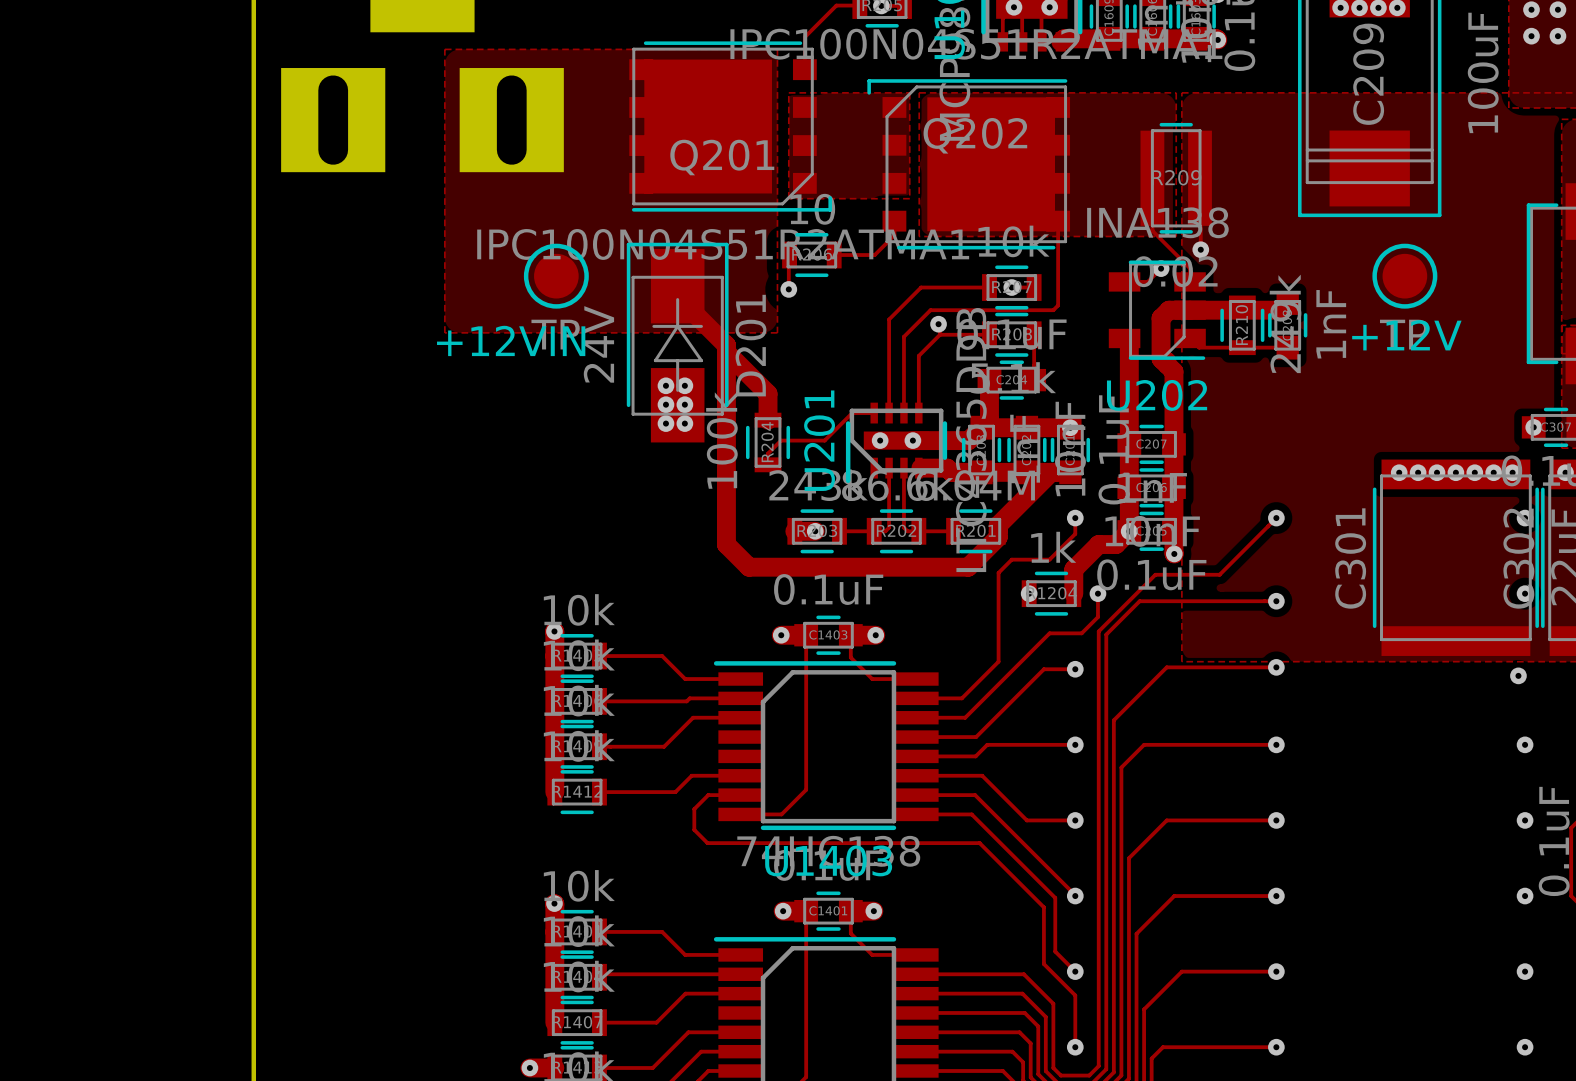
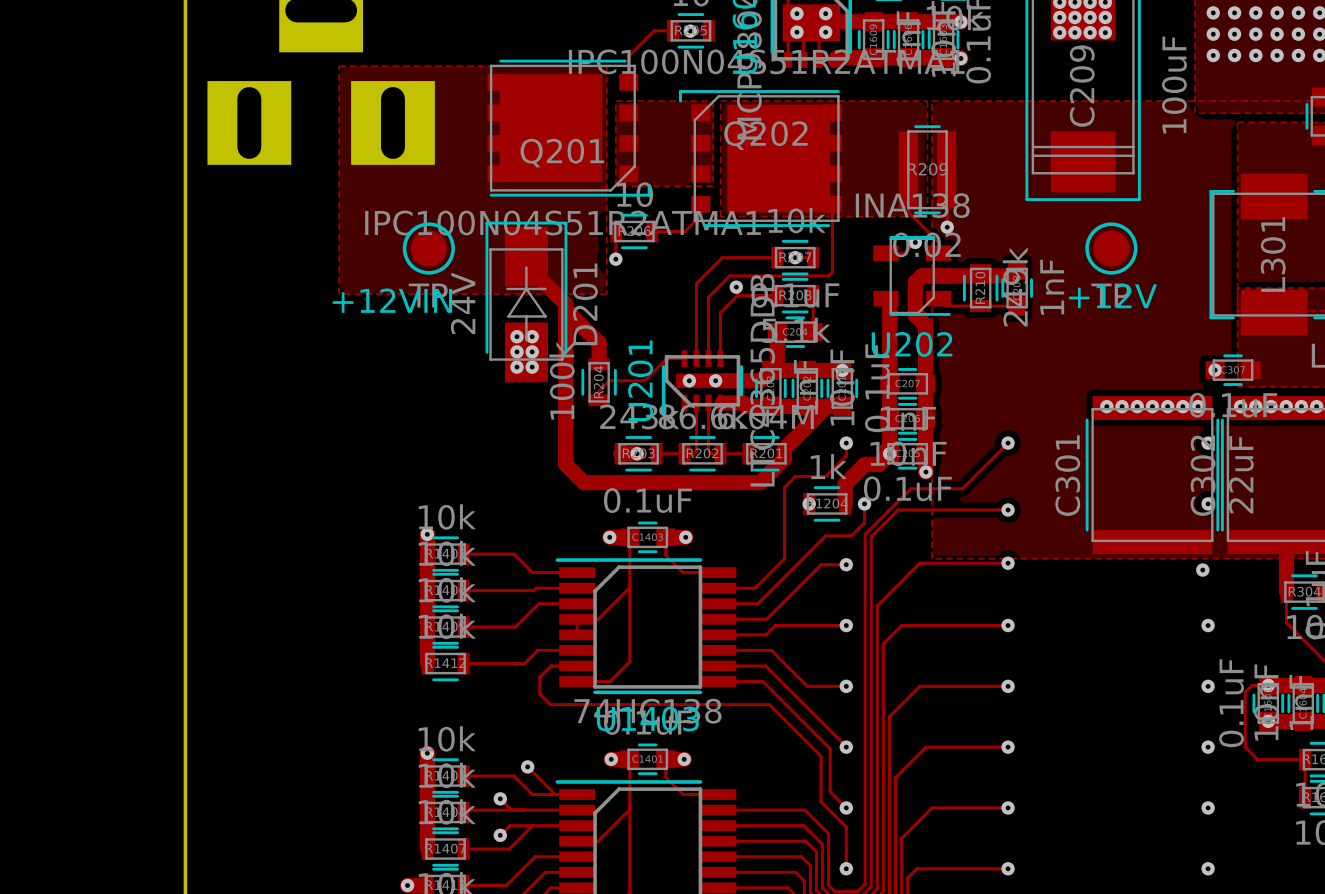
track: none -> (629, 587) (598, 619) (577, 619) (577, 634)
track: none -> (527, 766) (555, 794)
via: none -> (527, 766)
track: none -> (500, 798) (511, 810)
via: none -> (500, 798)
track: none -> (629, 809) (598, 841) (577, 841)
track: none -> (532, 825) (509, 825) (500, 835)
via: none -> (500, 835)

